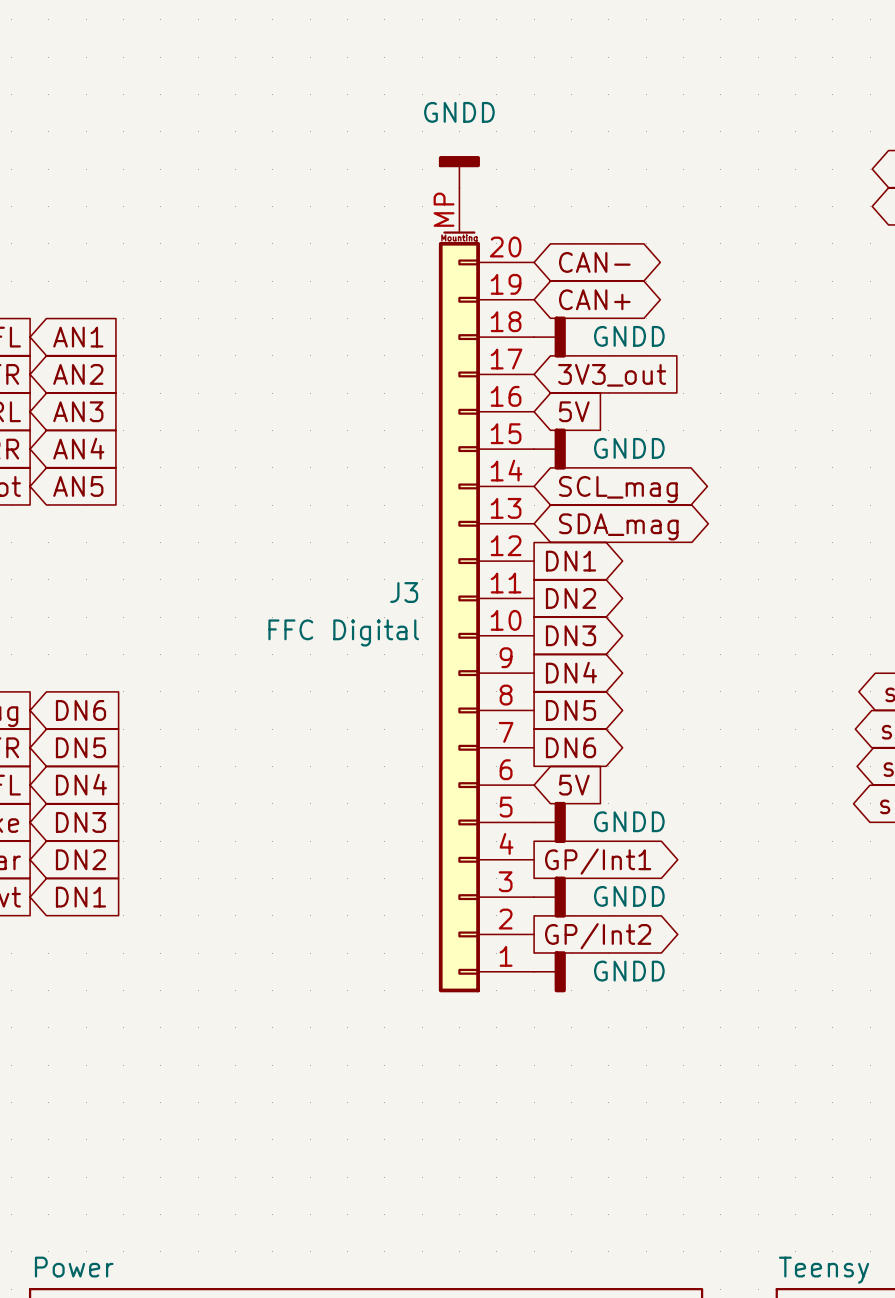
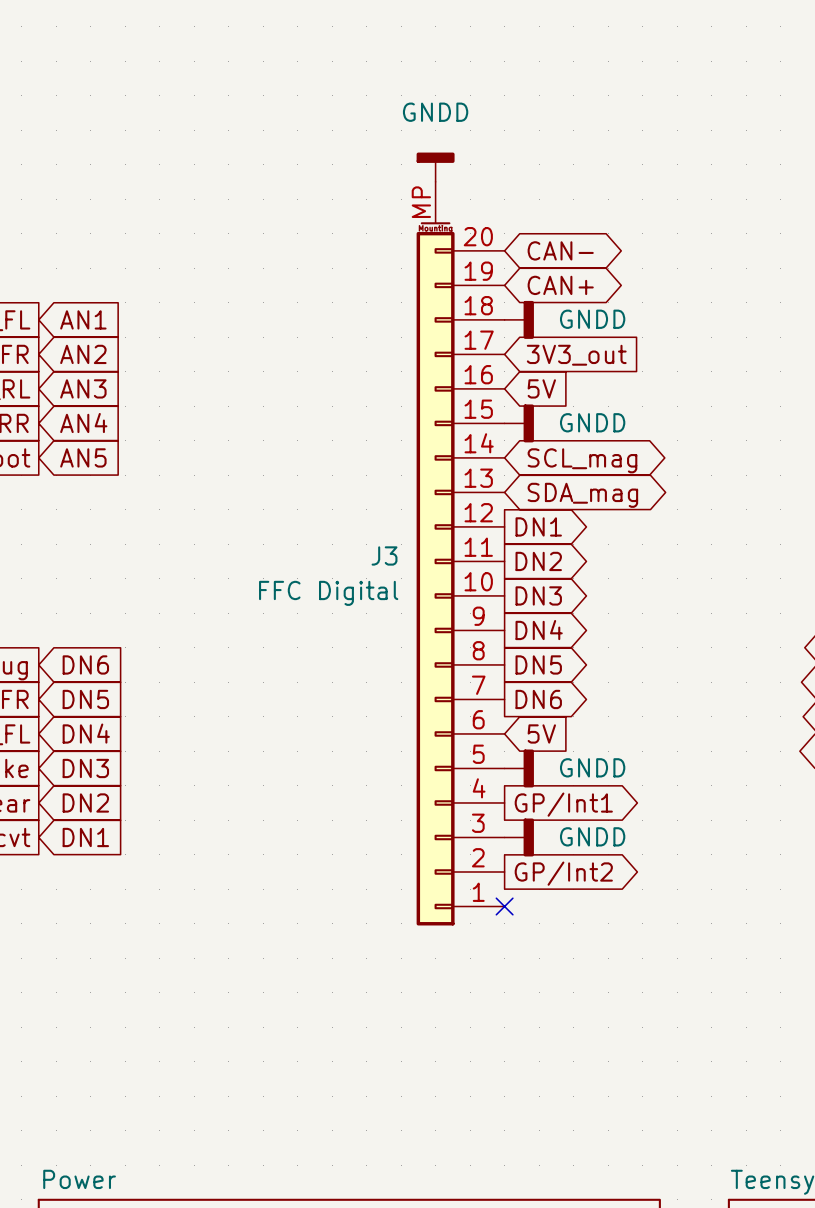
no-connect mark: none -> (504, 906)
power symbol: GNDD (549, 971) -> none

